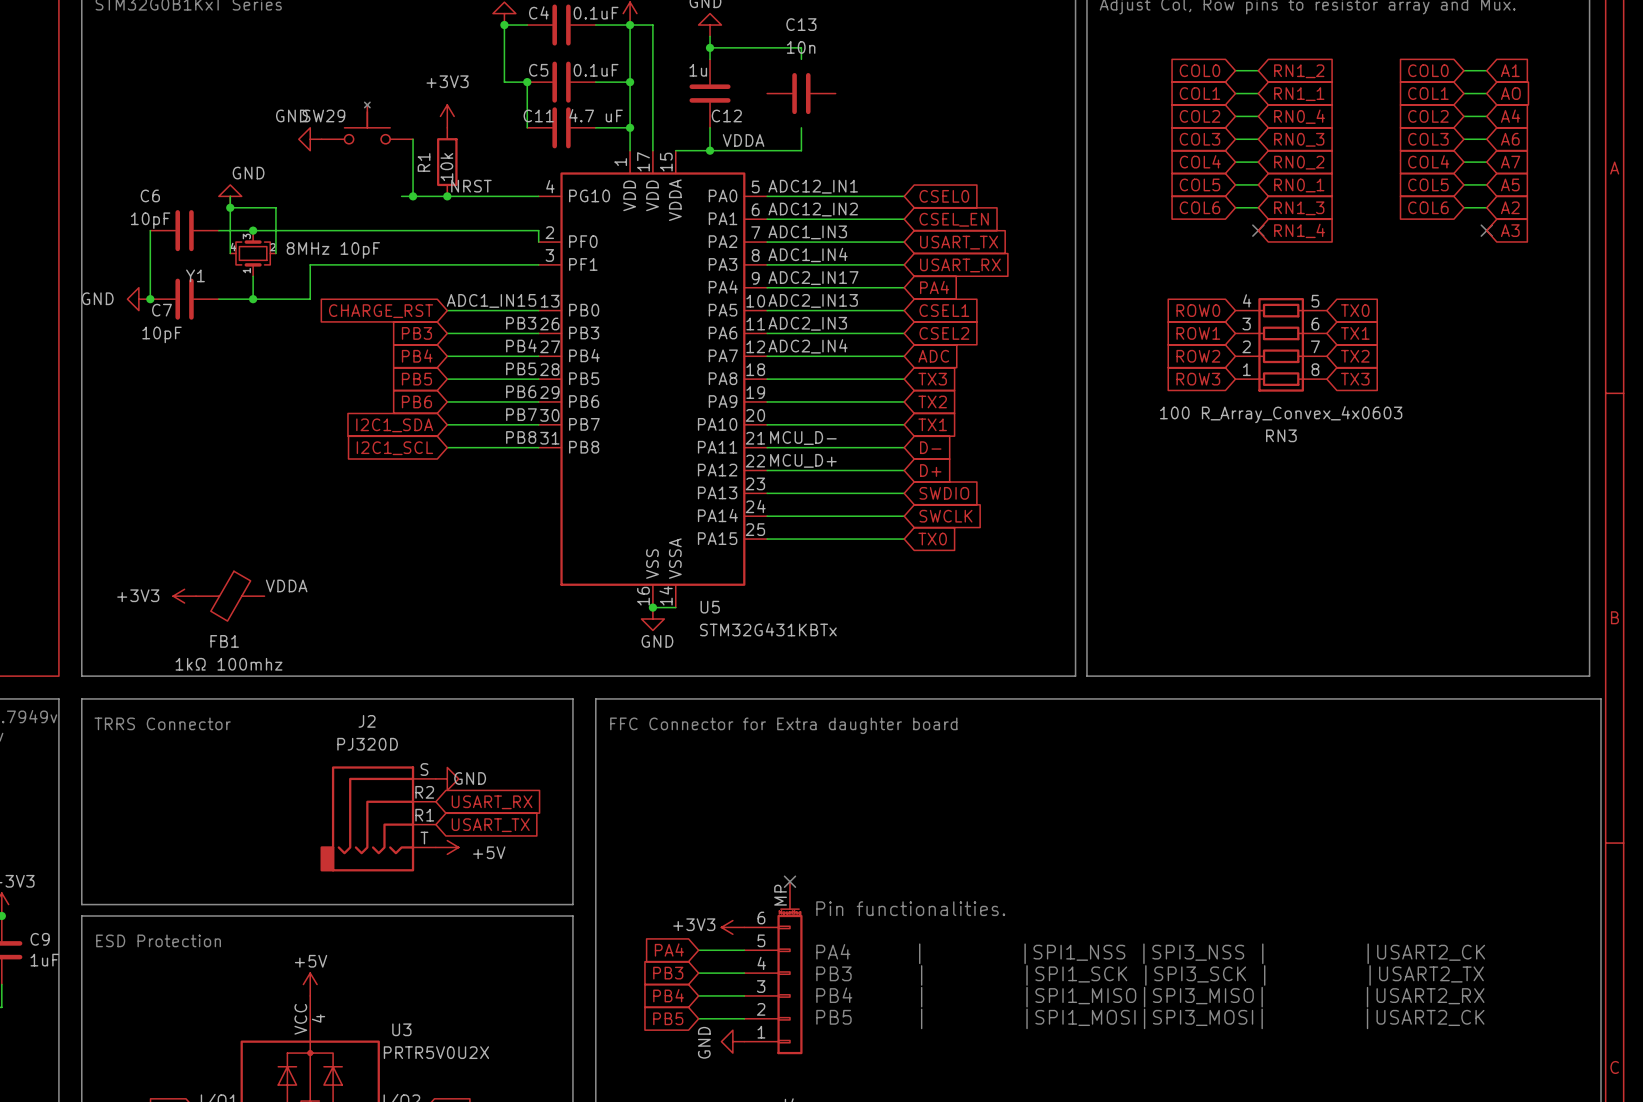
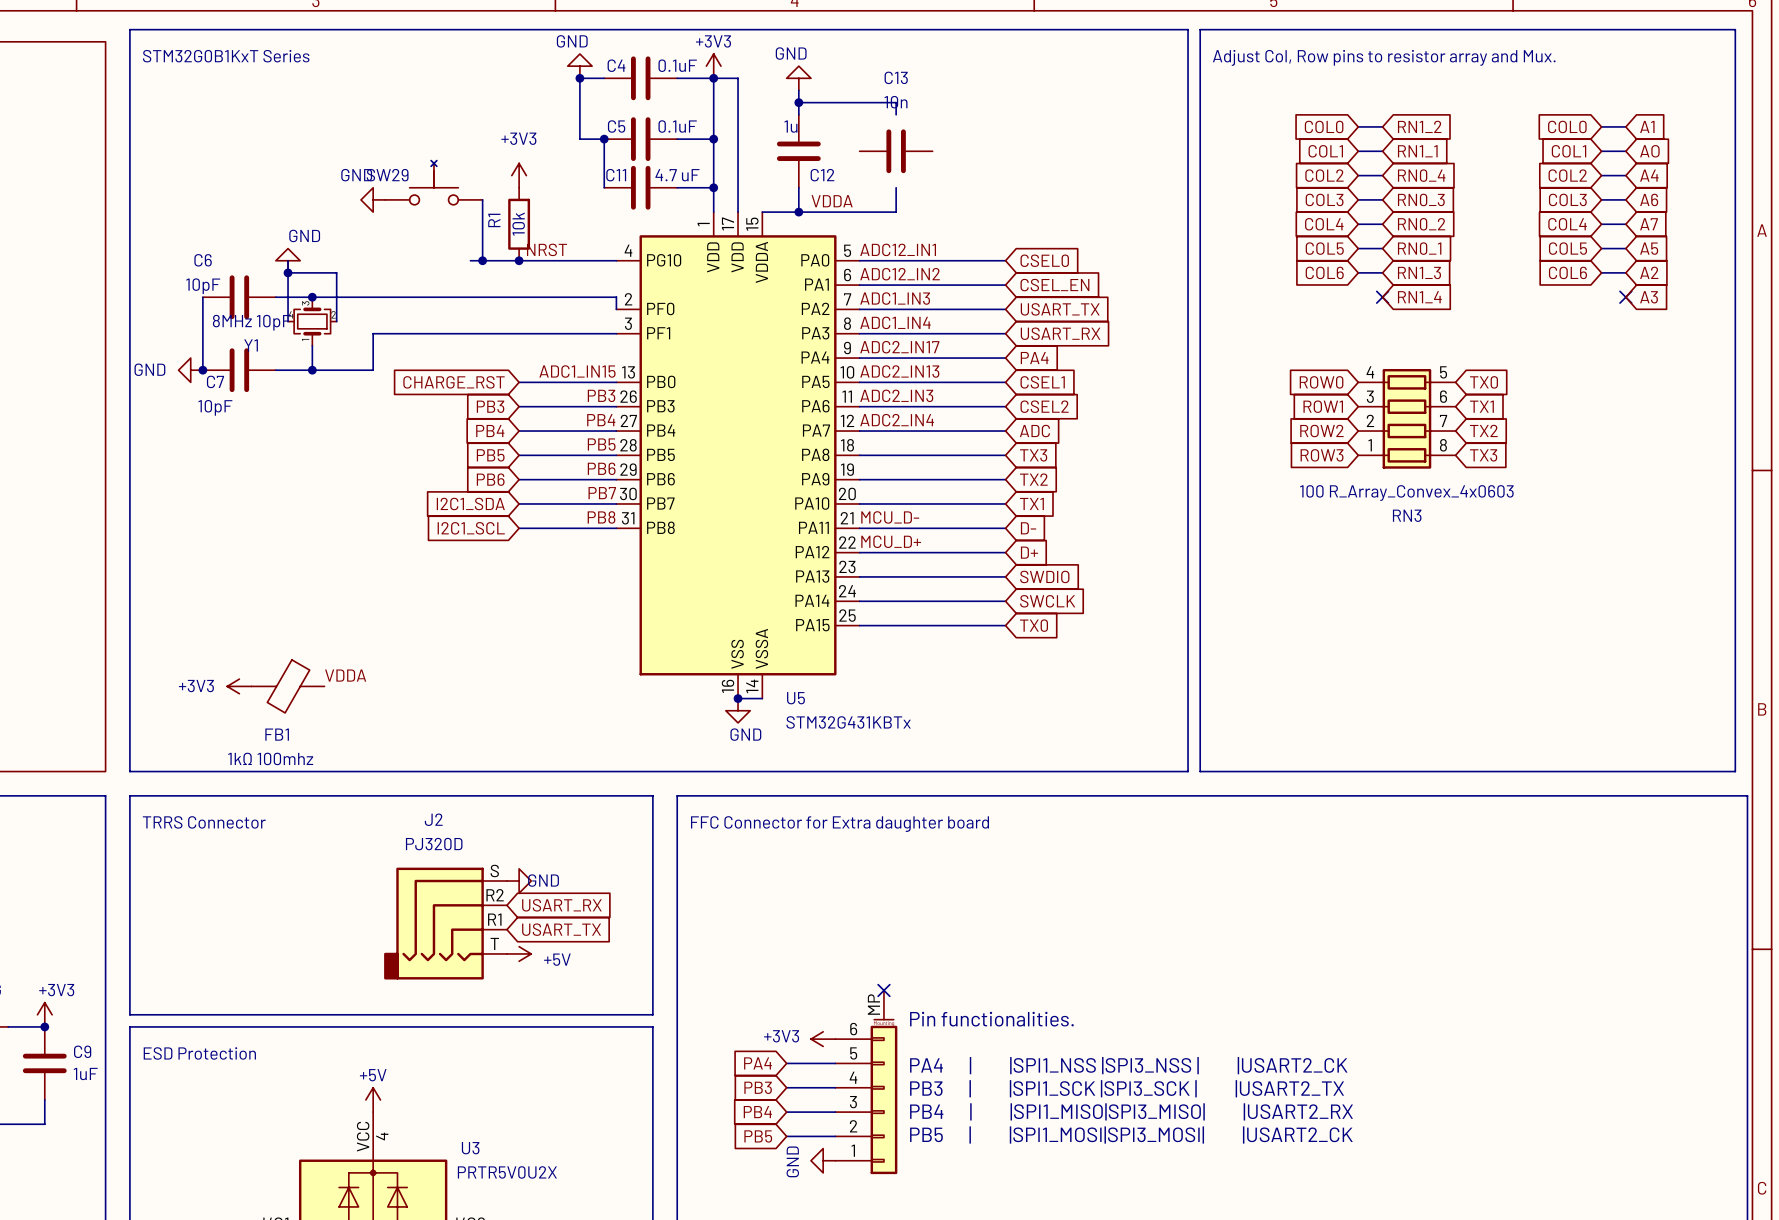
Y1 value position: 8MHz 10pF (333, 250) -> 8MHz 10pF (251, 322)

